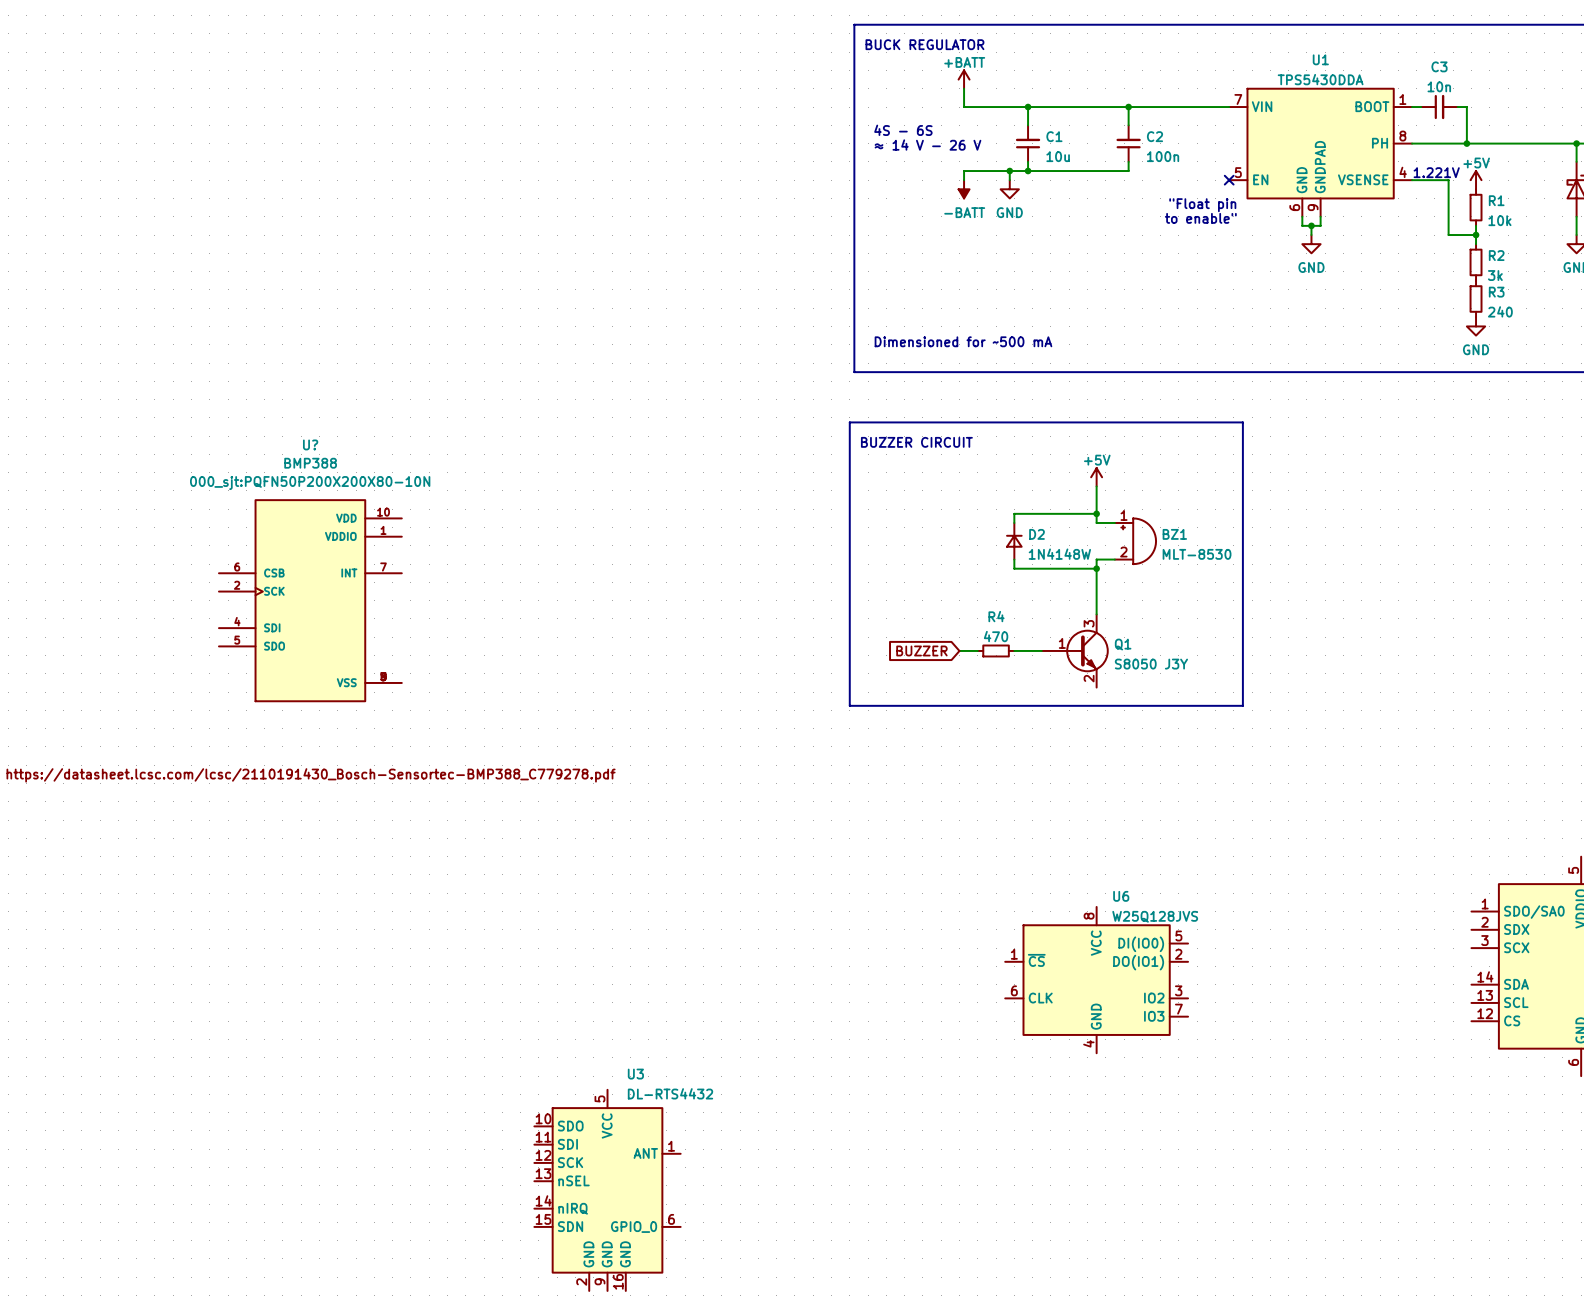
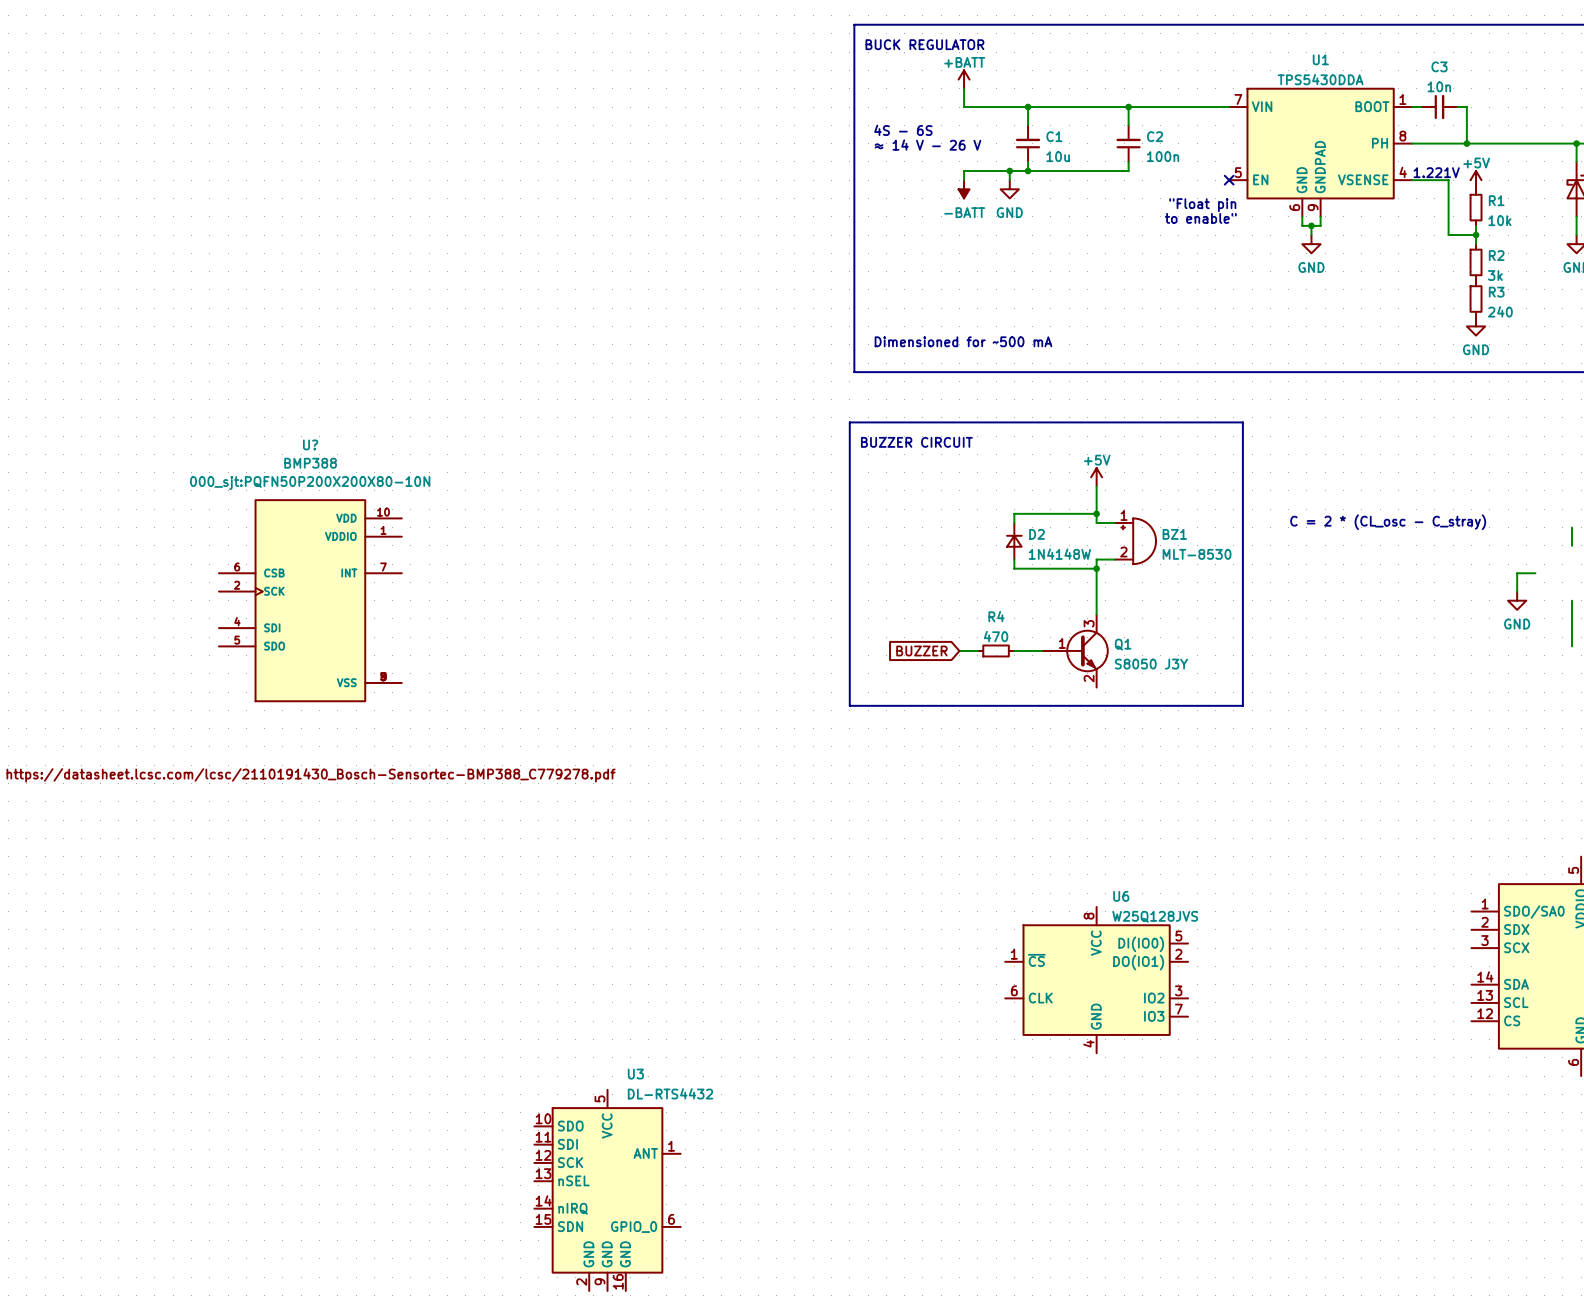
text: none -> C = 2 * (CL_osc - C_stray) (1388, 522)
wire: none -> (1572, 527) (1572, 545)
wire: none -> (1535, 573) (1517, 573) (1517, 591)
power symbol: none -> GND (1517, 600)
wire: none -> (1572, 600) (1572, 646)

